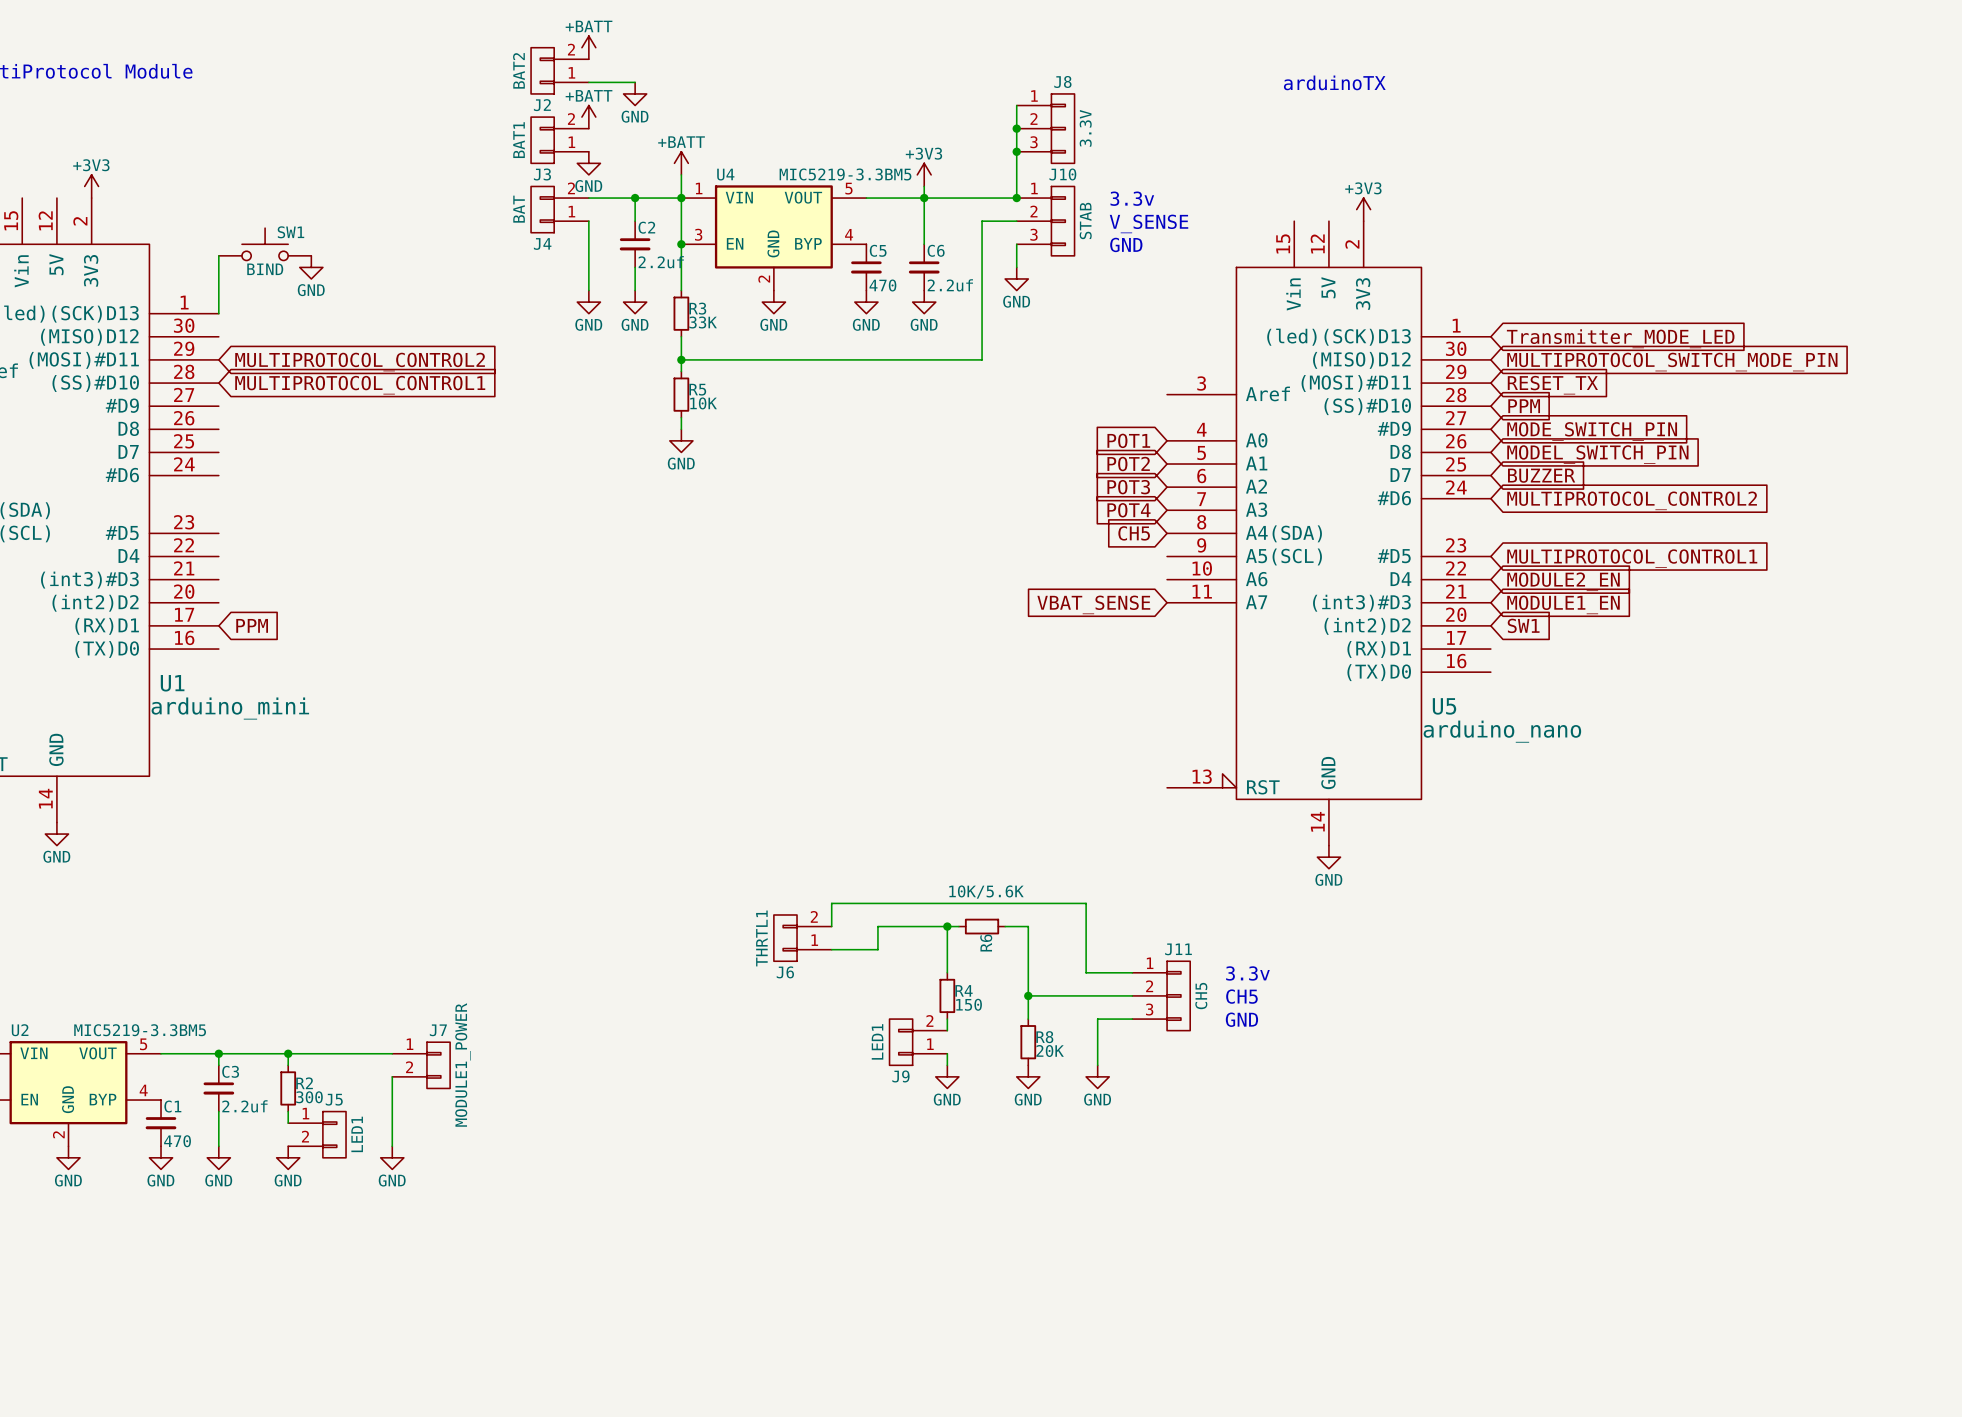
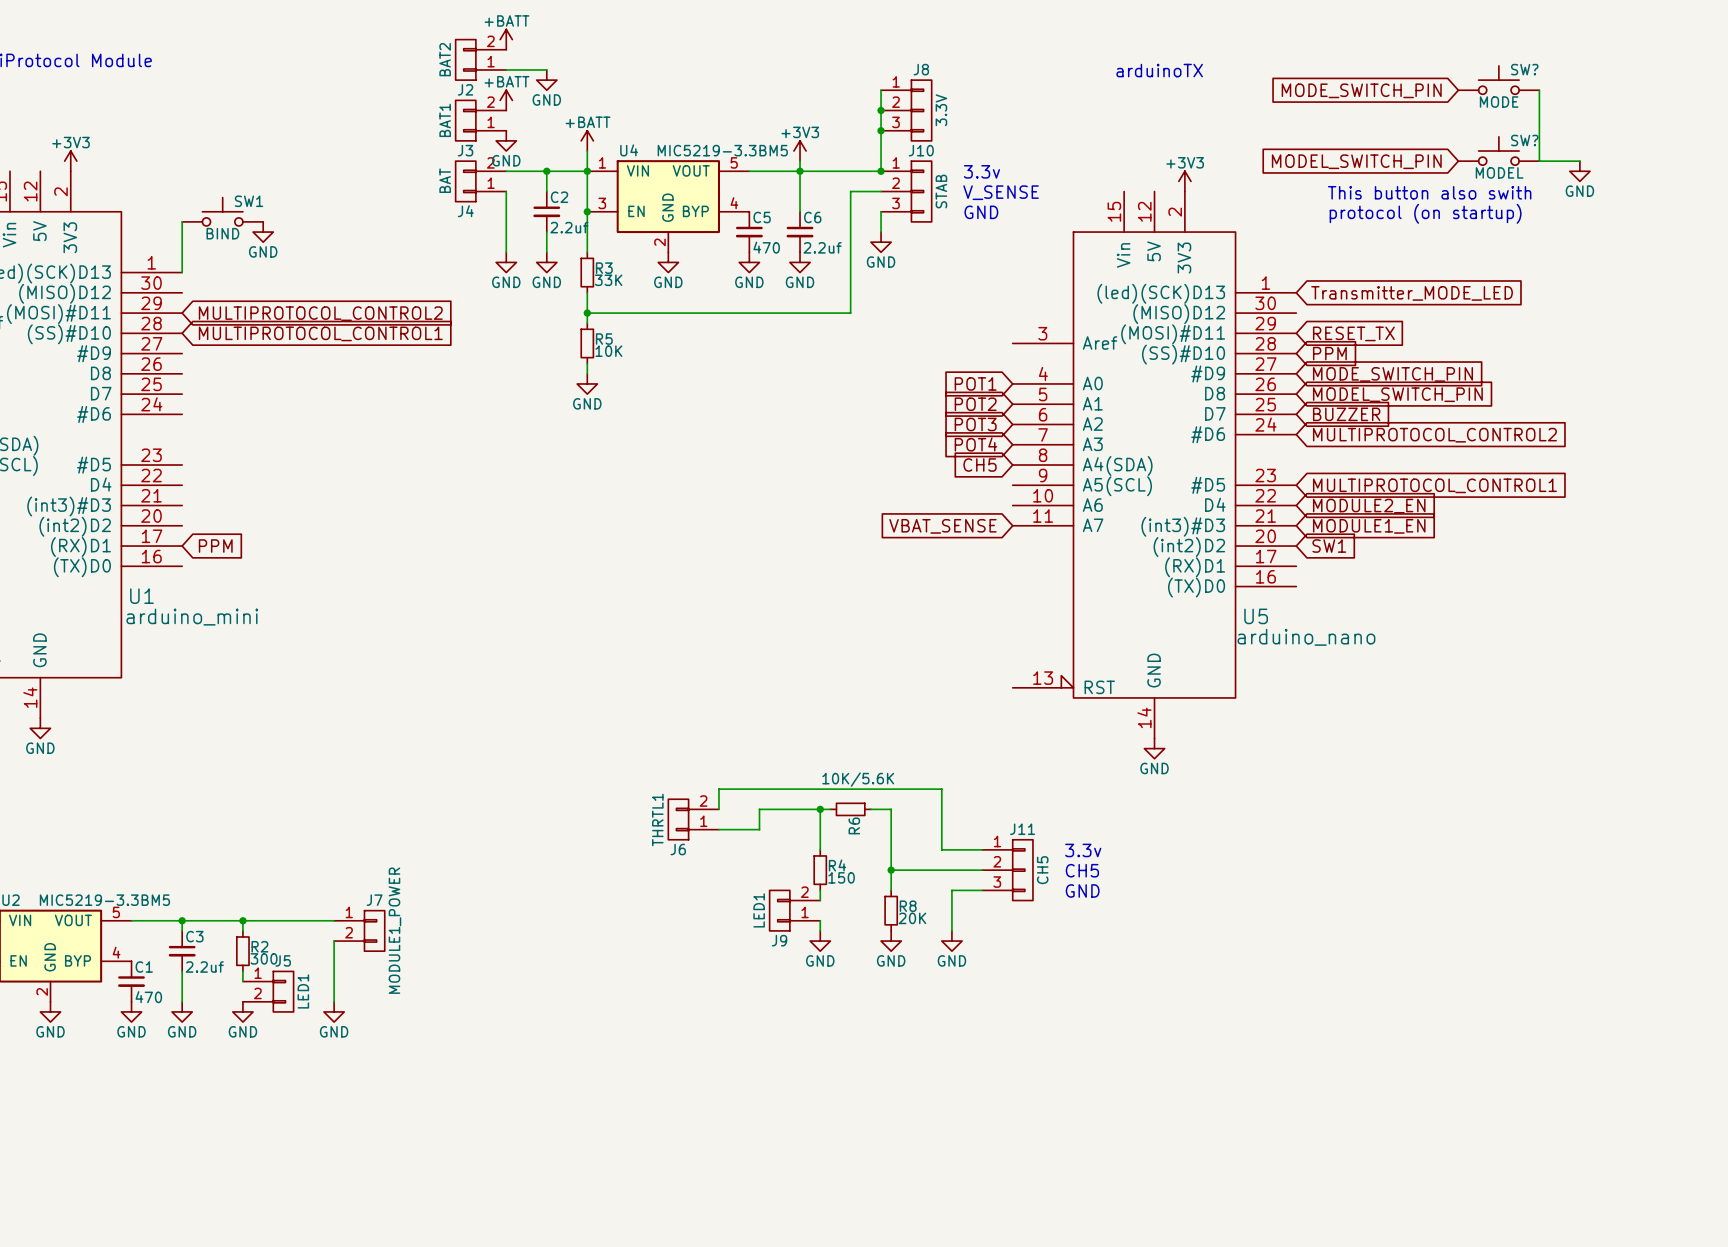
SW?: none -> MODE (1498, 80)
wire: none -> (1539, 90) (1539, 161) (1579, 161)
global label: none -> MODE_SWITCH_PIN (1361, 90)
SW?: none -> MODEL (1498, 151)
global label: none -> MODEL_SWITCH_PIN (1356, 161)
power symbol: none -> GND (1579, 171)
text: none -> This button also swith (1429, 192)
text: none -> protocol (on startup) (1425, 213)
global label: MULTIPROTOCOL_SWITCH_MODE_PIN (1672, 362) -> none

